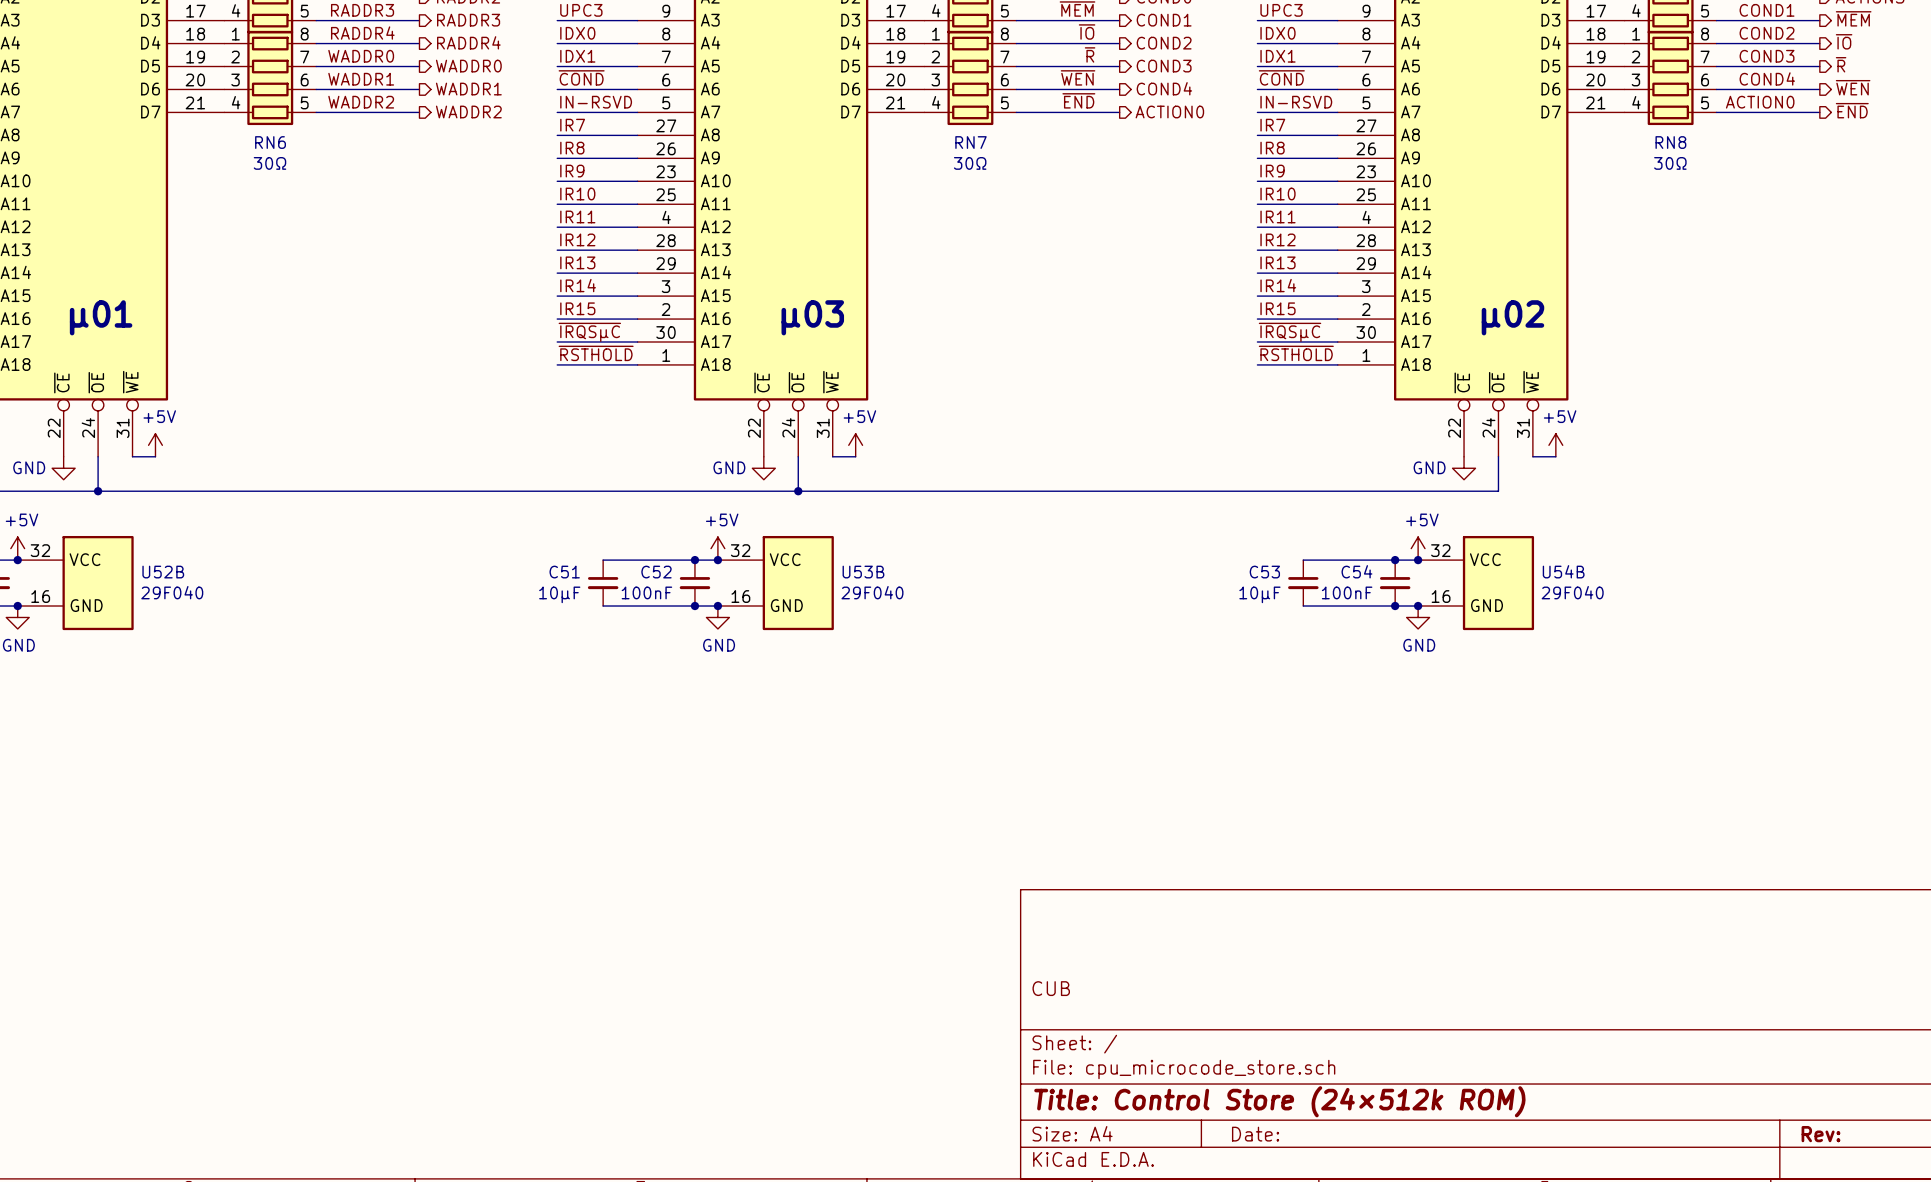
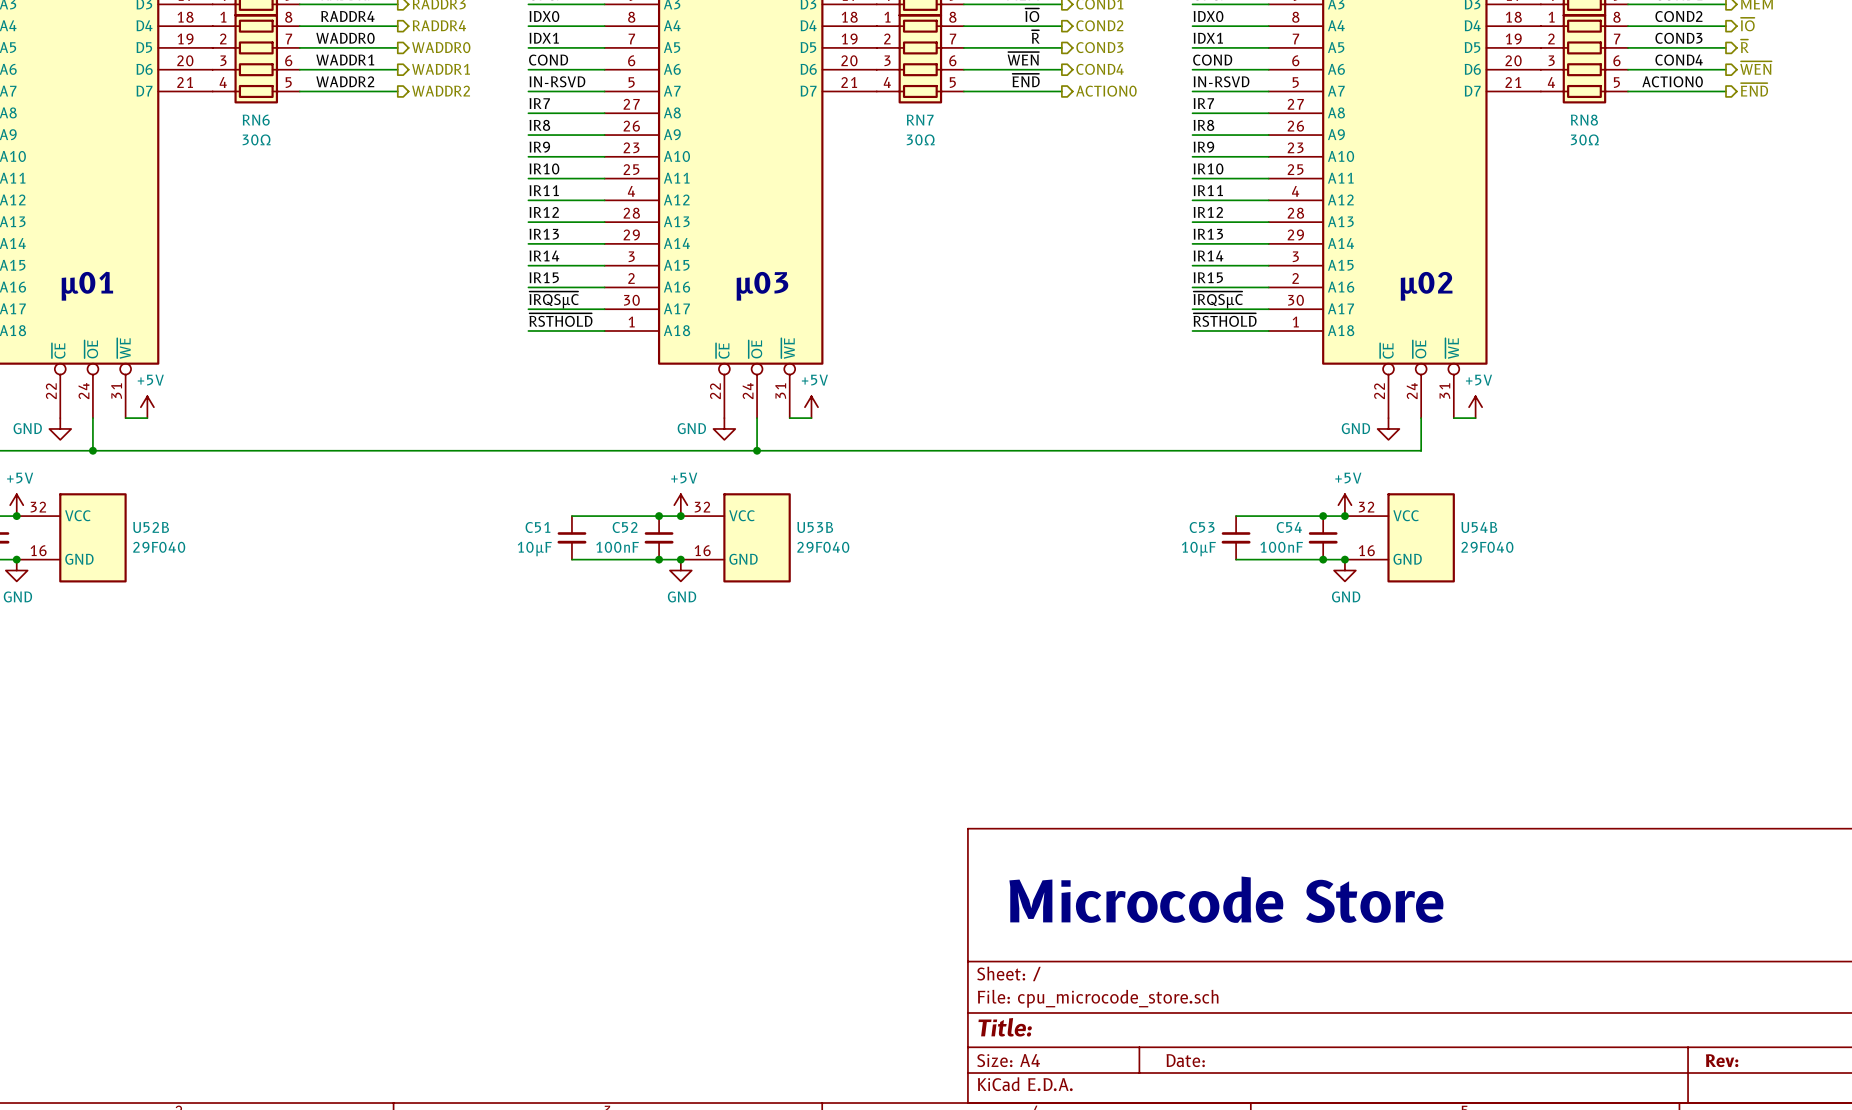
label: ~{COND} (581, 77) -> COND (548, 60)
label: ~{COND} (1281, 77) -> COND (1212, 60)
text: none -> Microcode Store (1226, 899)
title block: CUB (1051, 988) -> none
title block: Title: Control Store (24×512k ROM) (1279, 1101) -> Title: (1005, 1027)

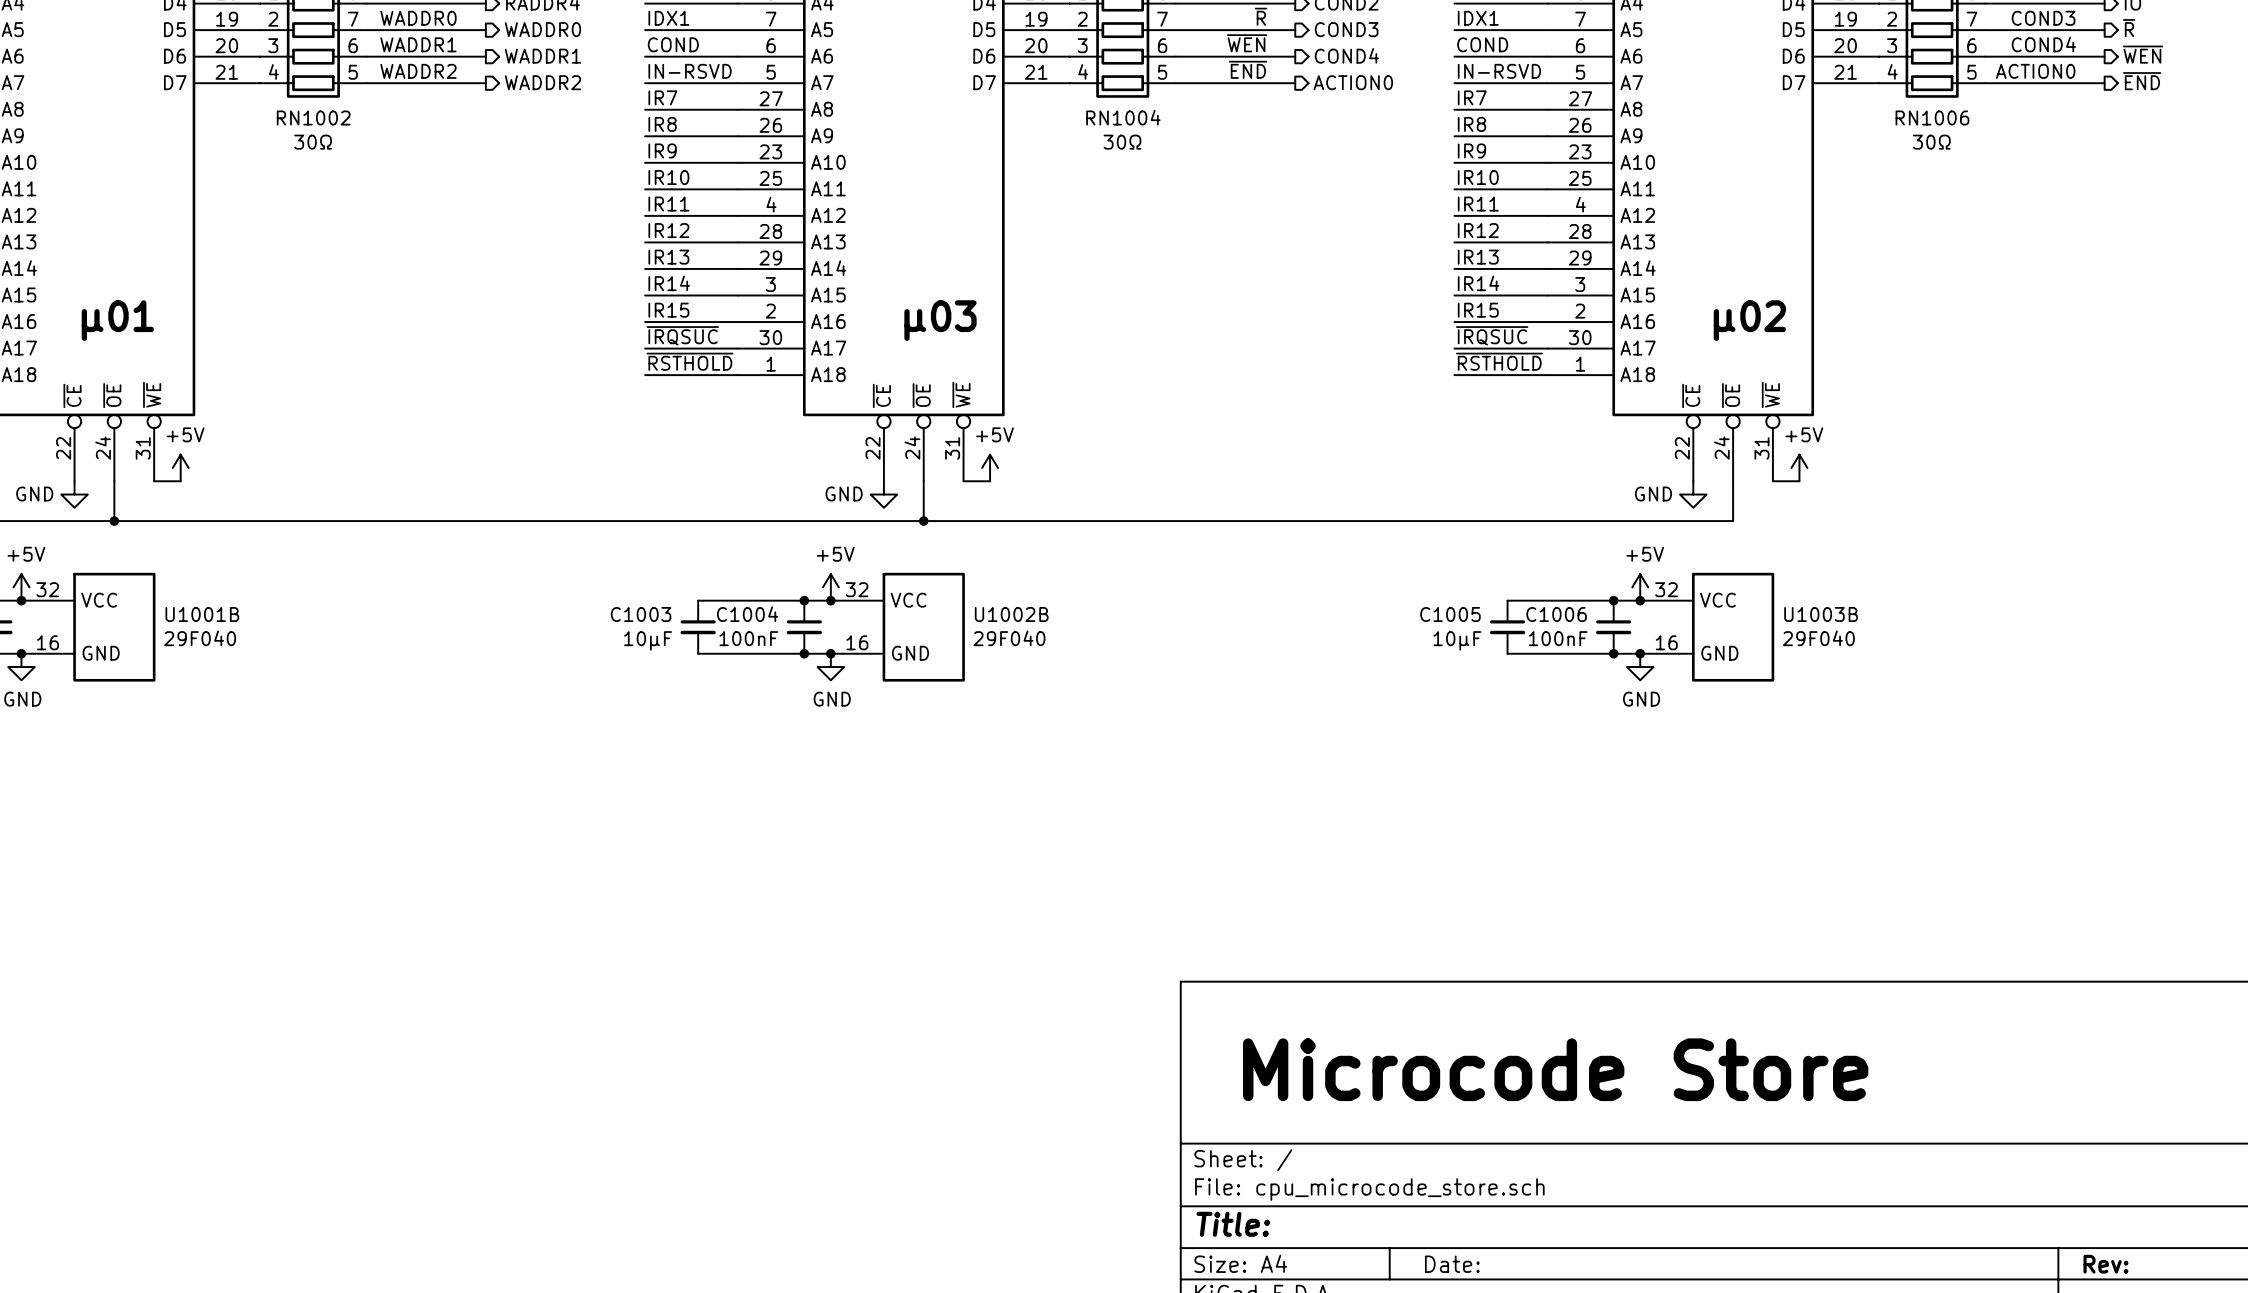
RN6 name: RN6 (256, 120) -> RN1002 (313, 118)
RN7 name: RN7 (920, 120) -> RN1004 (1123, 117)
RN8 name: RN8 (1584, 120) -> RN1006 (1932, 118)
label: ~{IRQSµC} (554, 300) -> ~{IRQSUC} (682, 335)
label: ~{IRQSµC} (1218, 300) -> ~{IRQSUC} (1492, 335)
U52B name: U52B (151, 527) -> U1001B (202, 614)
C51 name: C51 (537, 527) -> C1003 (641, 614)
C52 name: C52 (625, 527) -> C1004 (747, 614)
U53B name: U53B (815, 527) -> U1002B (1011, 614)
C53 name: C53 (1202, 527) -> C1005 (1450, 614)
C54 name: C54 (1289, 527) -> C1006 (1556, 614)
U54B name: U54B (1479, 527) -> U1003B (1821, 614)

